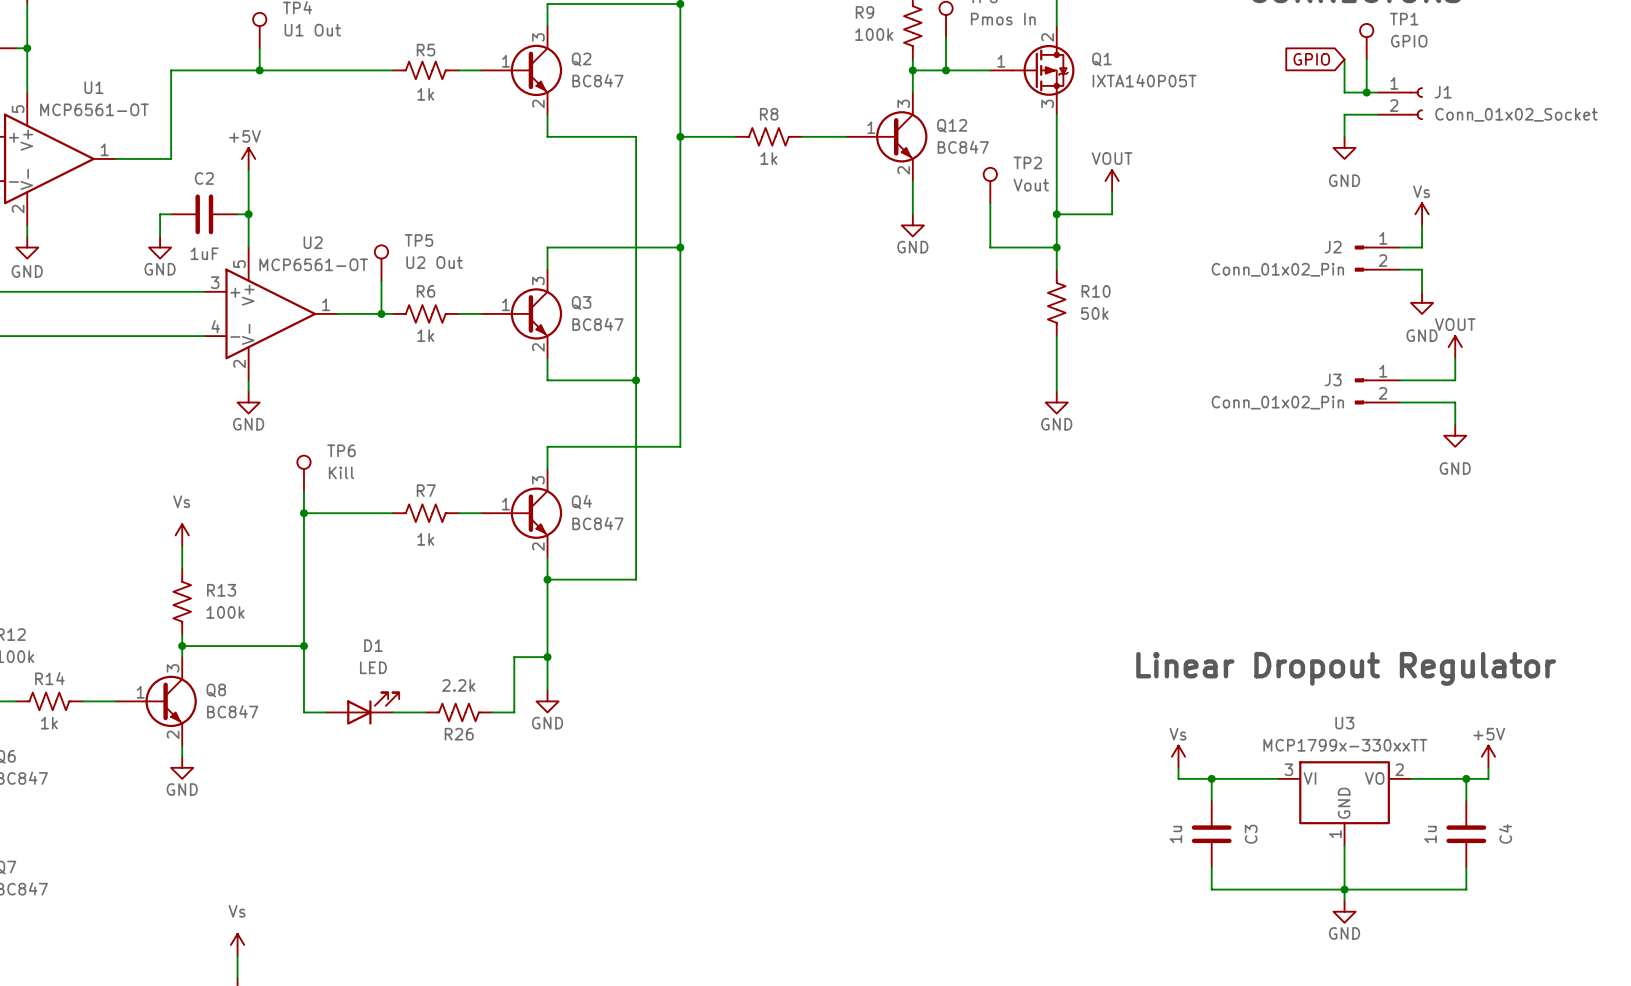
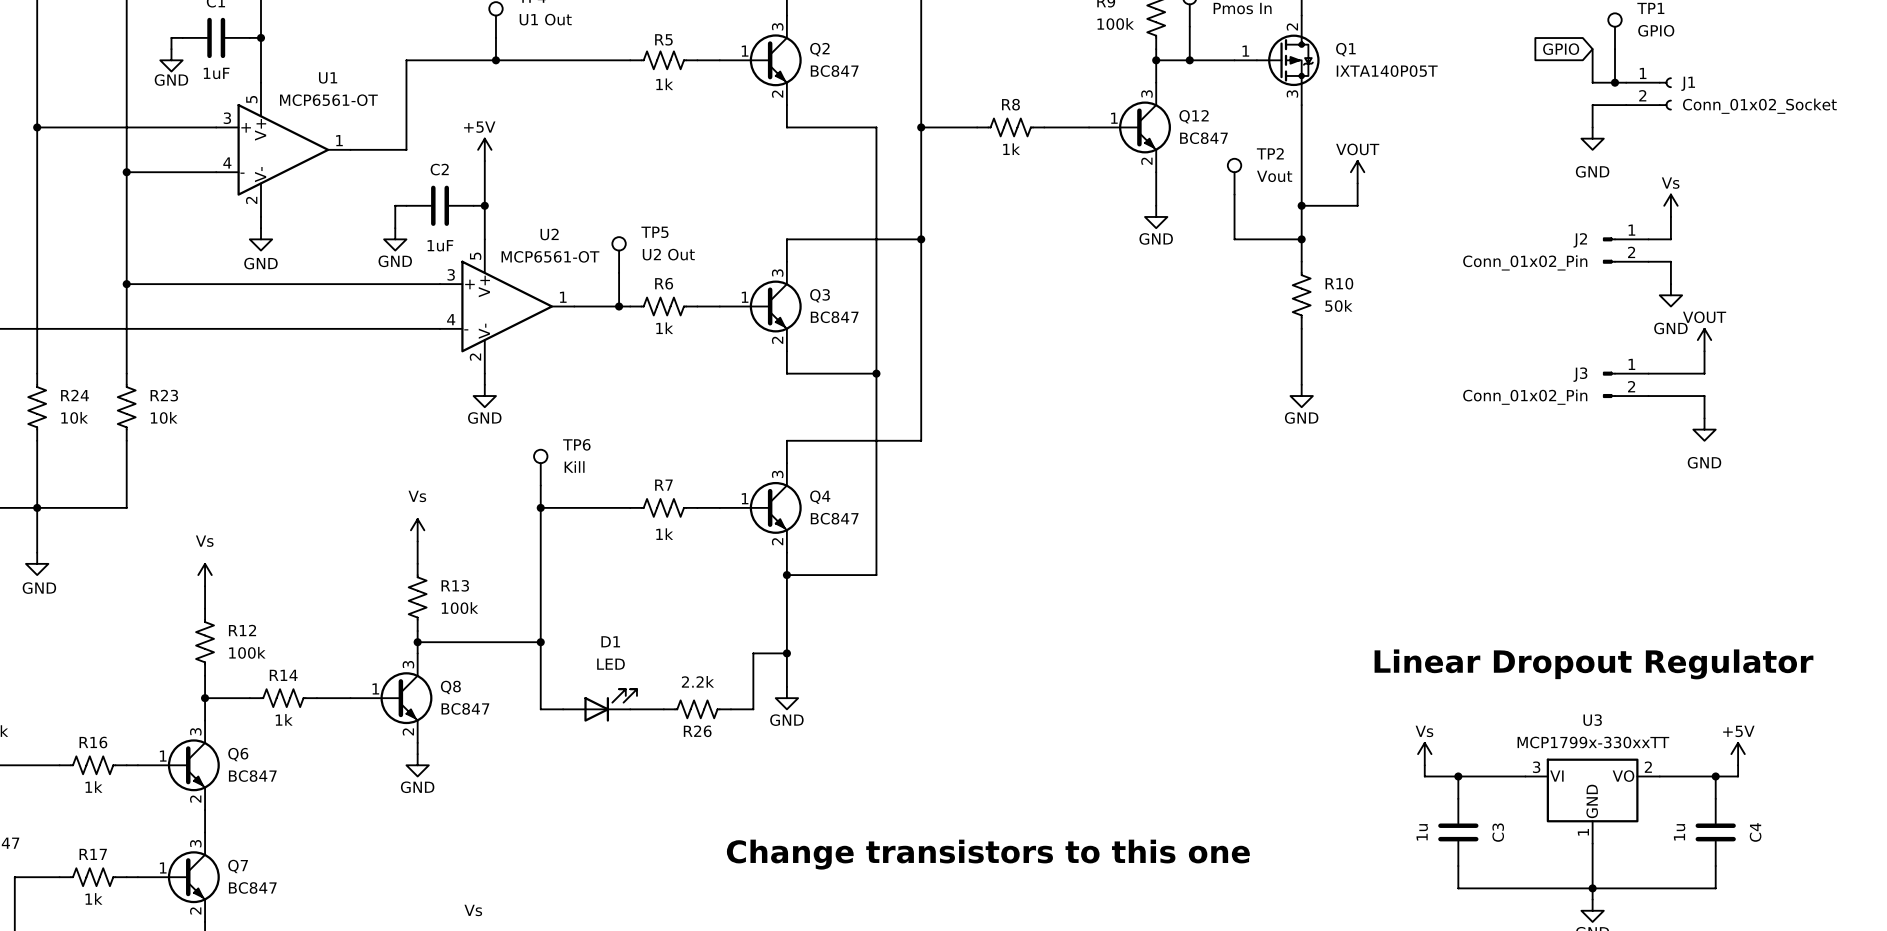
text: none -> Change transistors to this one (988, 854)

